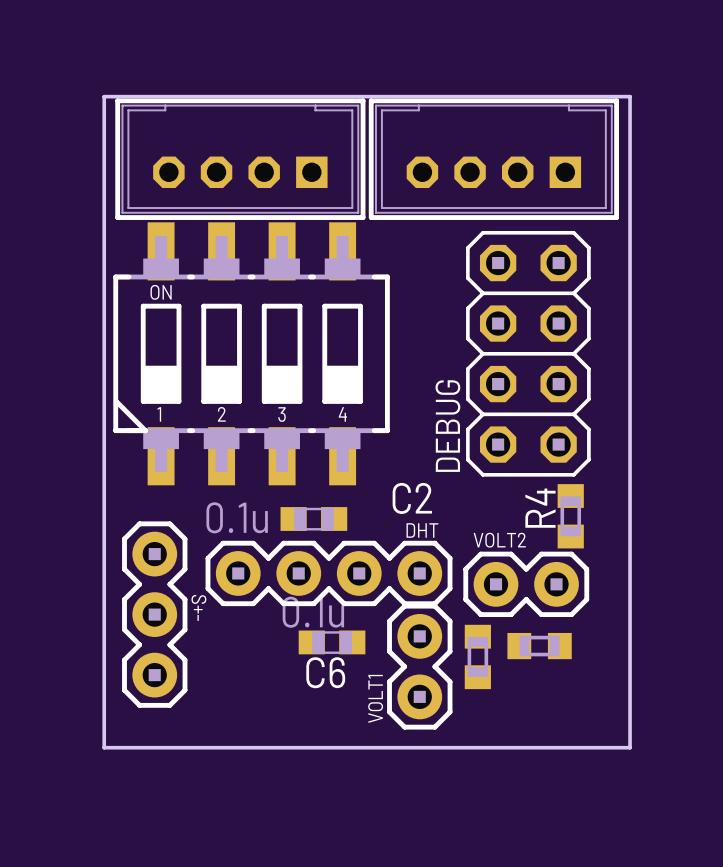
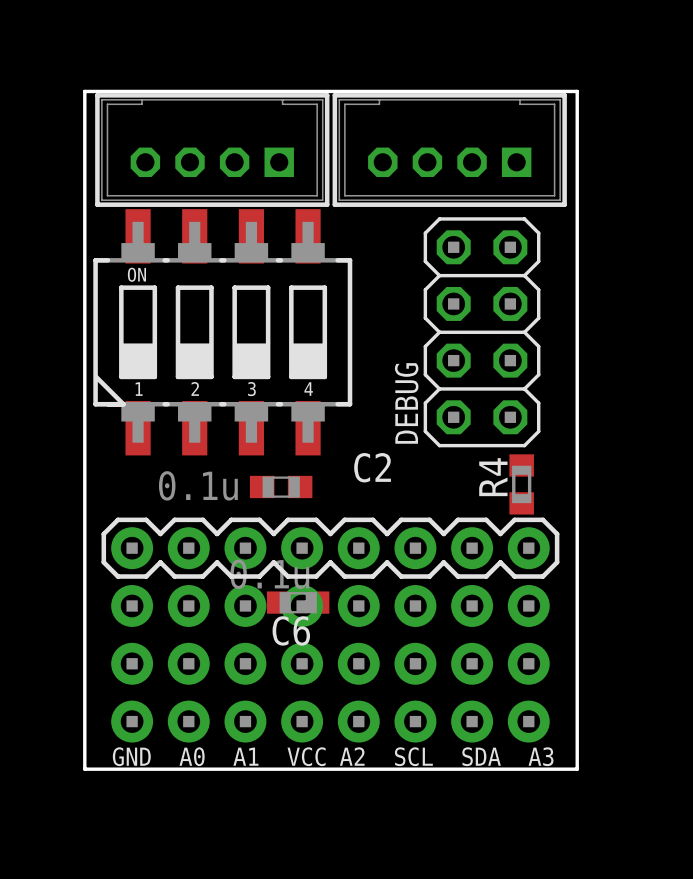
DHT: (329, 573) -> none
part: none -> (330, 548)
VOLT2: (526, 584) -> none
S+-: (154, 614) -> none
part: none -> (330, 605)
part: (539, 646) -> none
part: (477, 656) -> none
VOLT1: (419, 666) -> none
part: none -> (330, 663)
board edge: (104, 747) (630, 747) -> (84, 701) (84, 769) (577, 769) (577, 701)
part: none -> (330, 721)
text: none -> GND A0 A1 VCC (219, 756)
text: none -> A2 SCL SDA A3 (446, 756)

